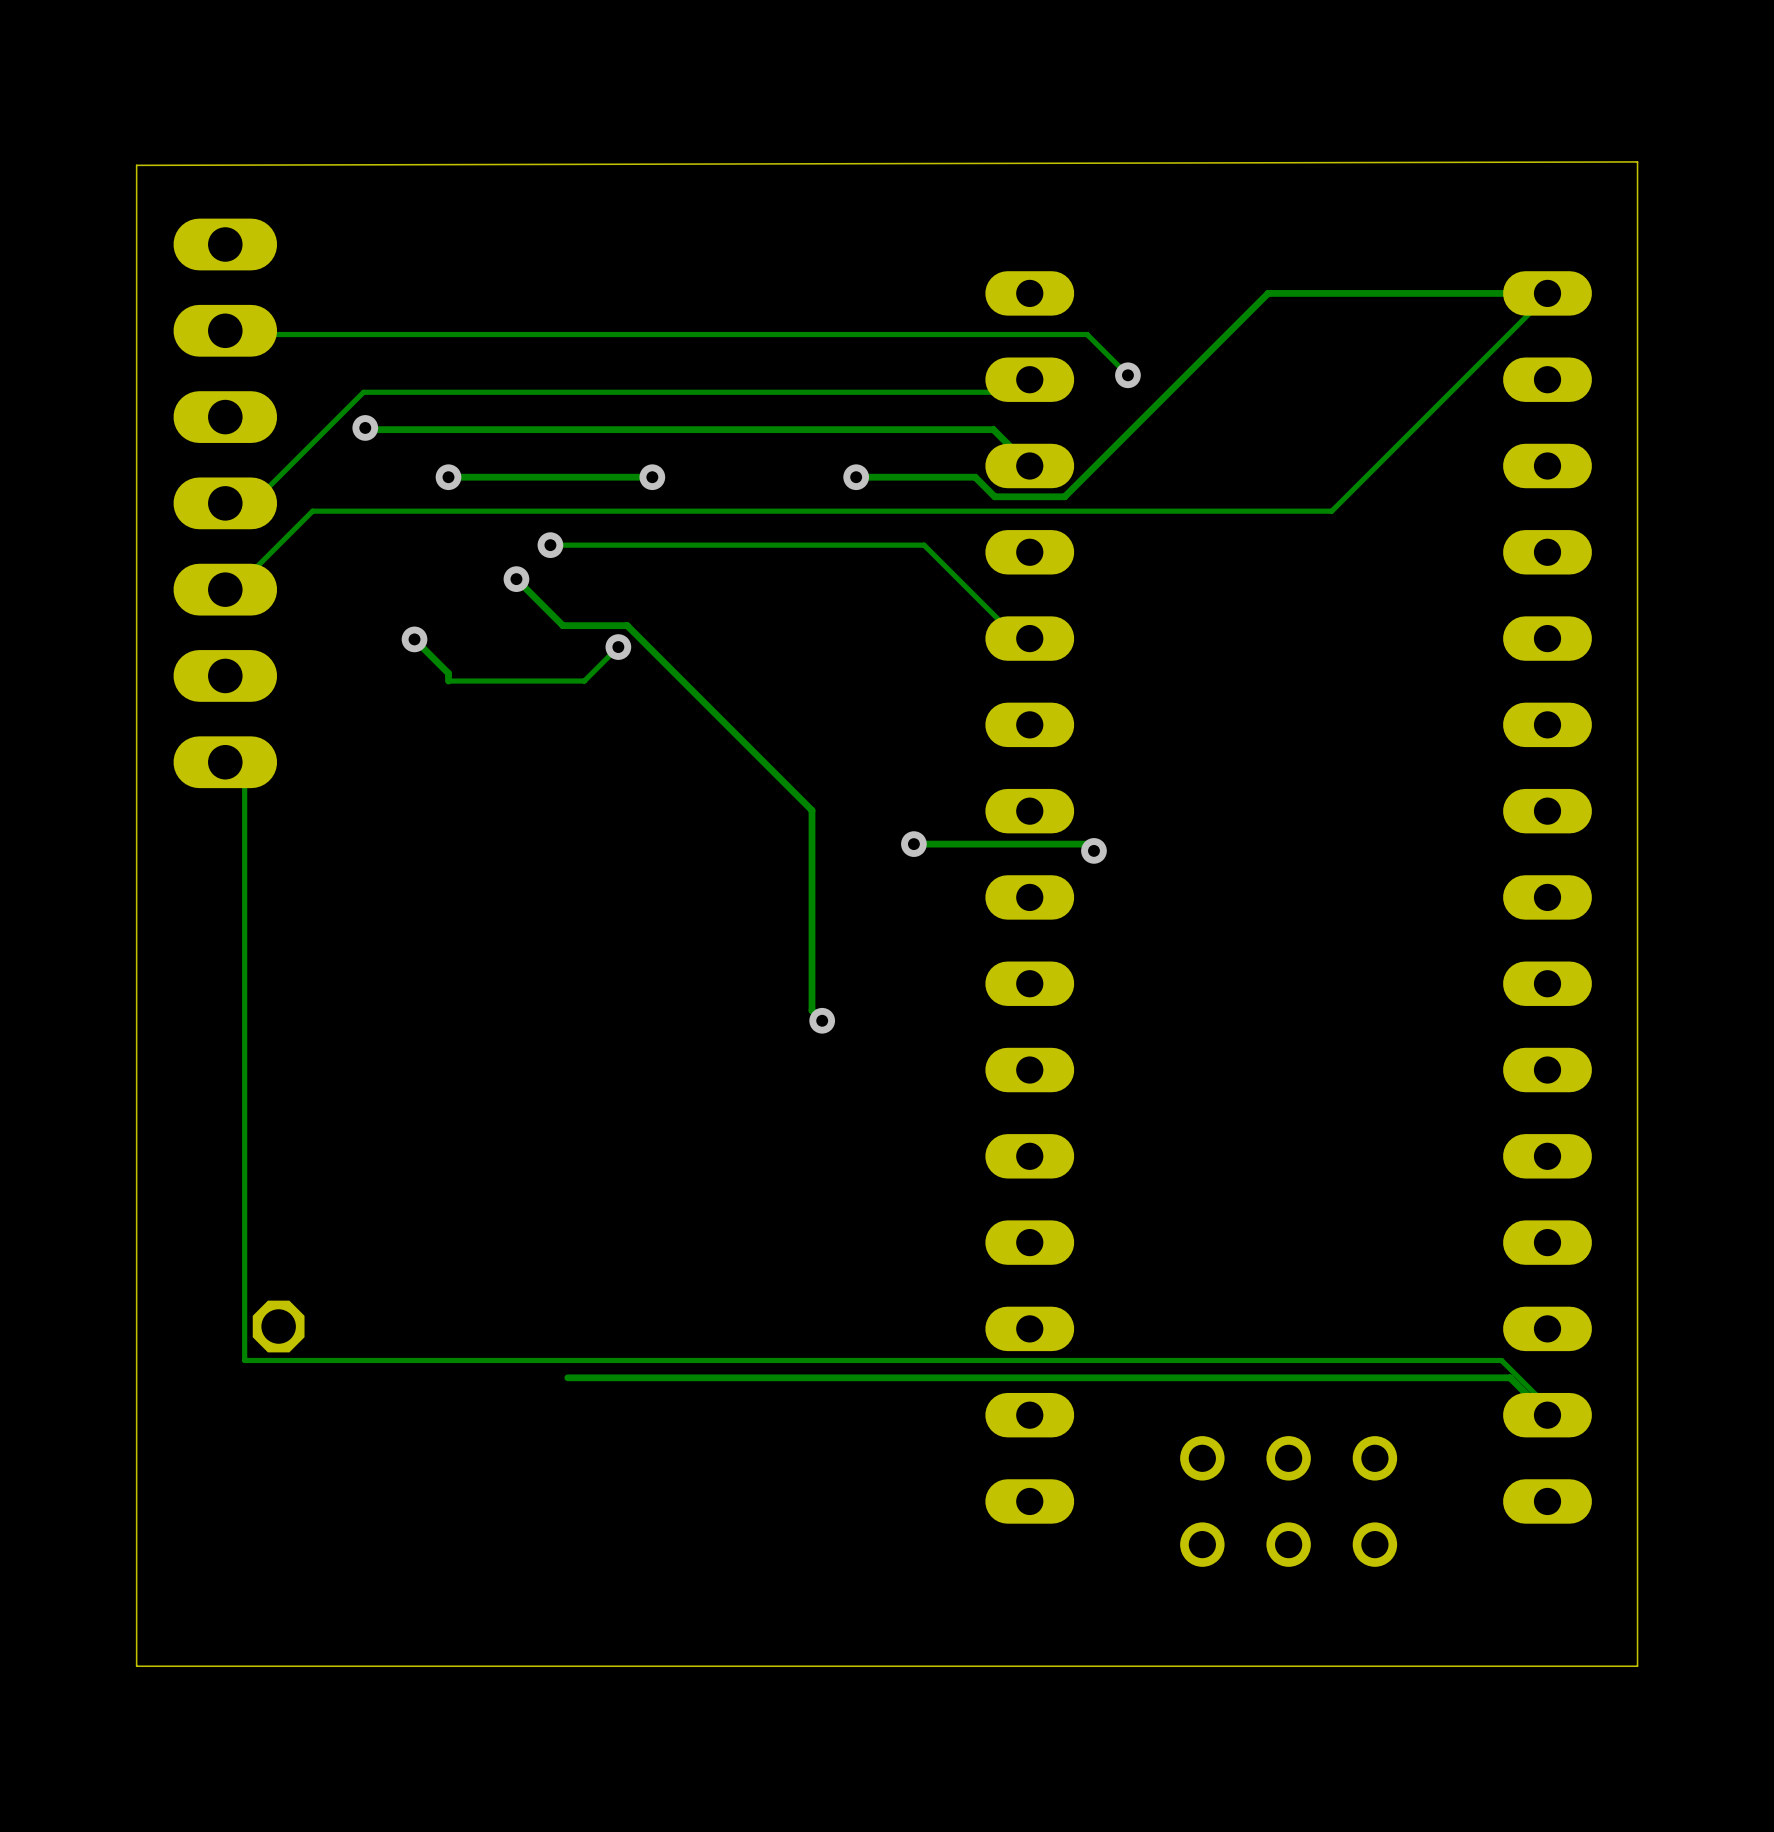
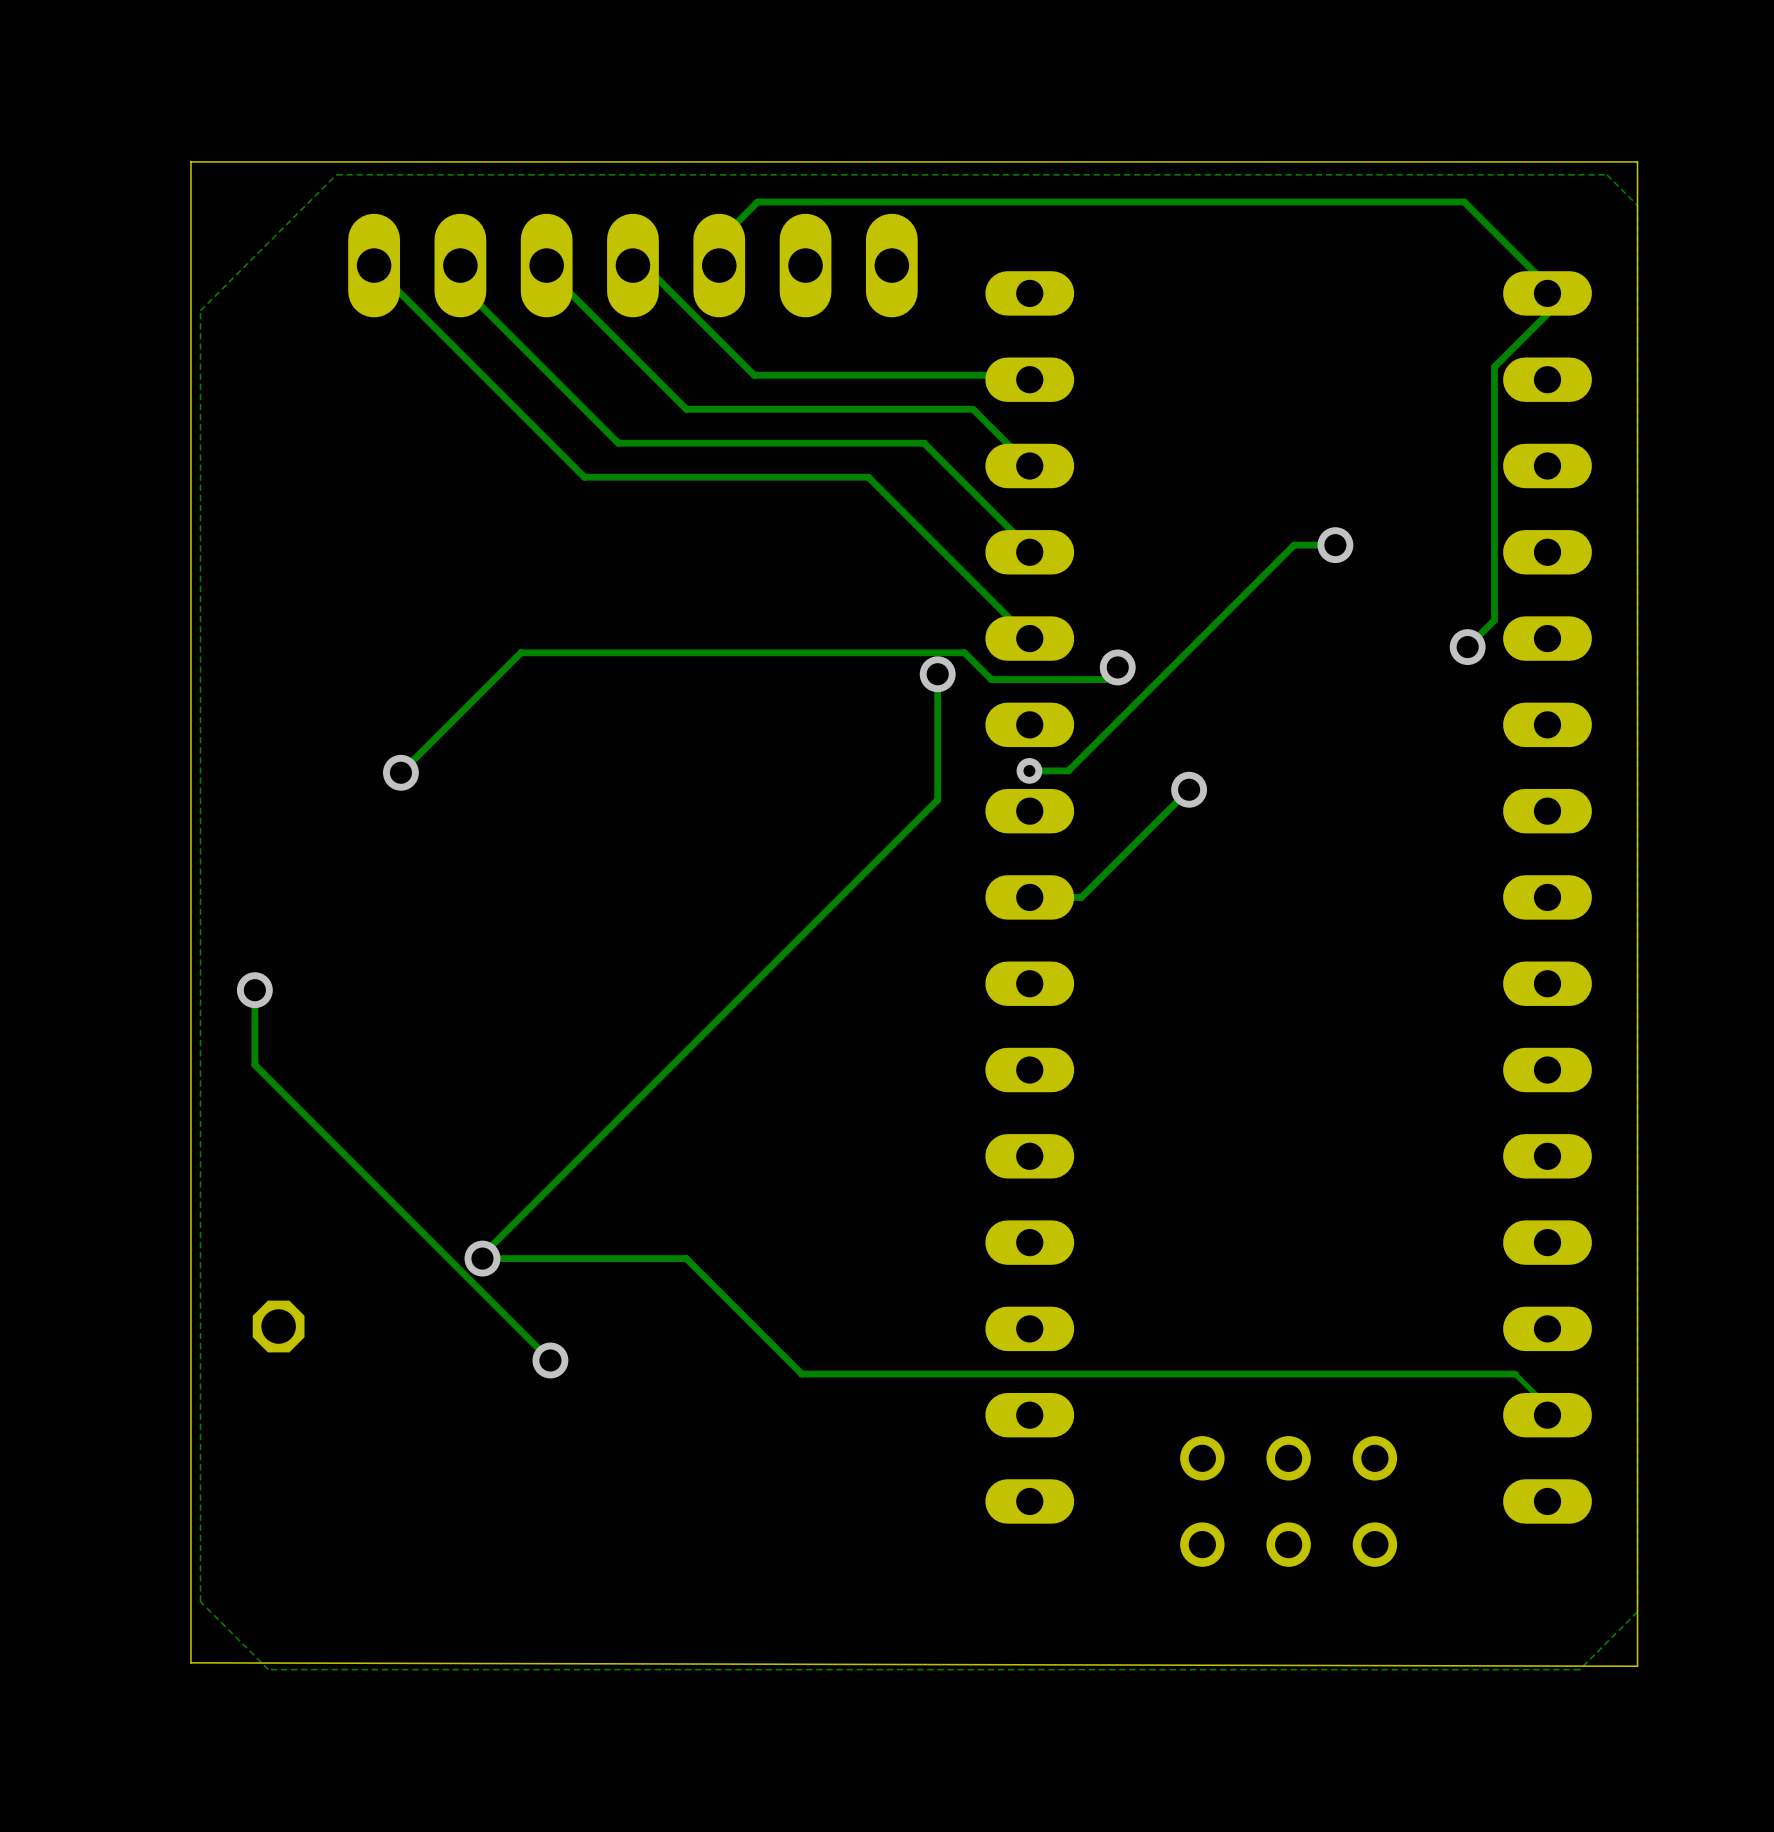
board edge: (1637, 161) (136, 165) (136, 1666) (1637, 1666) -> (1637, 161) (190, 161) (190, 1662) (1637, 1666)
zone outline: none -> (1606, 174) (336, 174) (200, 310) (200, 1601) (268, 1669) (1579, 1669) (1637, 1611) (1637, 205) (1606, 174)
track: none -> (460, 265) (448, 273) (618, 443) (924, 443) (1026, 545) (1029, 552)
track: none -> (719, 265) (720, 239) (757, 202) (1464, 202) (1535, 273) (1547, 293) (1547, 313) (1494, 366) (1494, 620) (1467, 647)
track: (225, 330) (232, 334) (1087, 334) (1127, 375) -> none
via: (1127, 375) -> none
track: (1029, 379) (1017, 392) (363, 392) (244, 511) (225, 503) -> (1029, 379) (1026, 375) (754, 375) (652, 273) (632, 265)
track: (365, 427) (366, 426) (370, 429) (993, 429) -> (546, 265) (550, 273) (686, 409) (973, 409) (993, 429)
via: (365, 427) -> none
via: (448, 477) -> none
track: (584, 477) (448, 477) -> (584, 477) (374, 265)
via: (652, 477) -> none
track: none -> (856, 477) (652, 477)
via: (856, 477) -> none
track: (868, 477) (975, 477) (994, 496) (1064, 496) (1268, 293) (1547, 293) (1331, 511) (312, 511) (244, 579) (225, 589) -> none
part rotation: 0° (225, 503) -> 90° clockwise (632, 265)
part position: (225, 503) -> (632, 265)
track: (550, 545) (924, 545) (1026, 647) (1029, 638) -> (868, 477) (1029, 638)
via: (550, 545) -> none
track: none -> (1335, 545) (1294, 545) (1068, 770) (1029, 770)
via: none -> (1335, 545)
track: (516, 579) (562, 625) (627, 625) (812, 810) (812, 1010) (822, 1020) -> none
via: (516, 579) -> none
track: (414, 639) (448, 673) (448, 681) (584, 681) (618, 647) -> none
via: (414, 639) -> none
via: (618, 647) -> none
via: none -> (1467, 647)
track: none -> (1117, 667) (1105, 679) (991, 679) (964, 652) (520, 652) (400, 772)
via: none -> (1117, 667)
via: none -> (937, 674)
track: (225, 762) (244, 782) (244, 1360) (1501, 1360) (1515, 1374) -> (937, 674) (937, 799) (482, 1255) (482, 1258) (686, 1258) (801, 1374) (1515, 1374)
via: none -> (1029, 770)
via: none -> (400, 772)
track: none -> (1189, 789) (1081, 897) (1029, 897)
via: none -> (1189, 789)
track: (913, 844) (1087, 844) (1093, 850) -> none
via: (913, 844) -> none
via: (1093, 850) -> none
track: none -> (254, 990) (254, 1064) (550, 1360)
via: none -> (254, 990)
via: (822, 1020) -> none
via: none -> (482, 1258)
via: none -> (550, 1360)
track: (567, 1377) (1510, 1377) (1547, 1415) -> none

